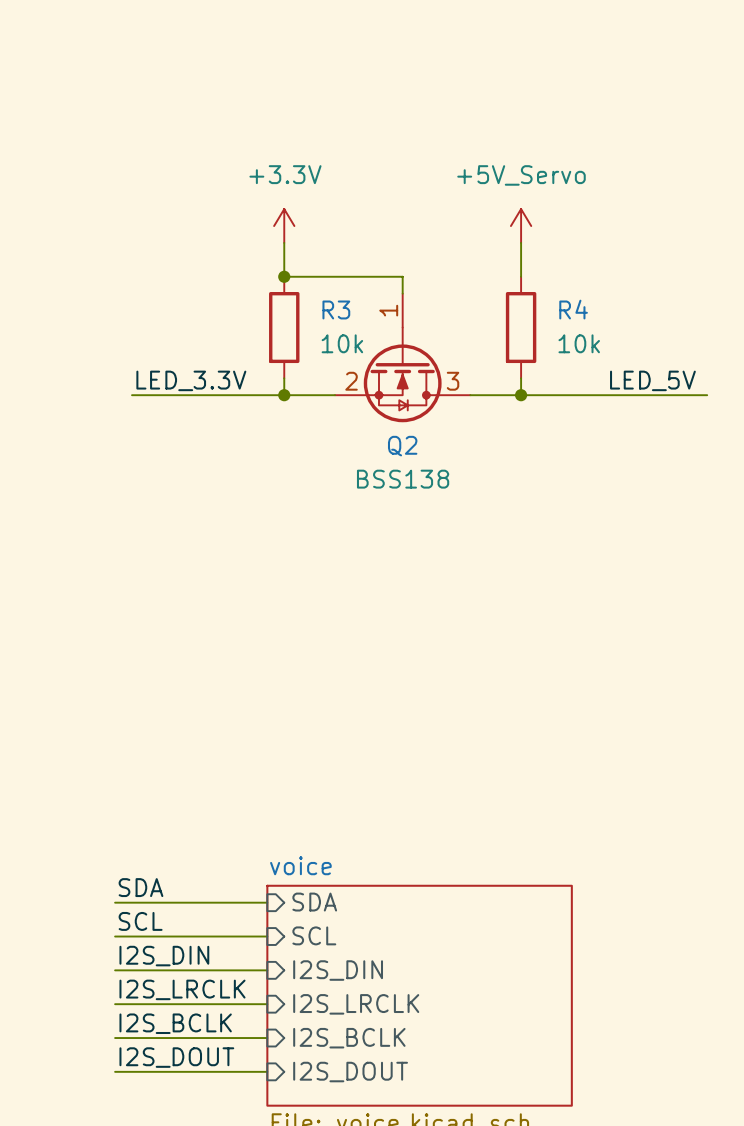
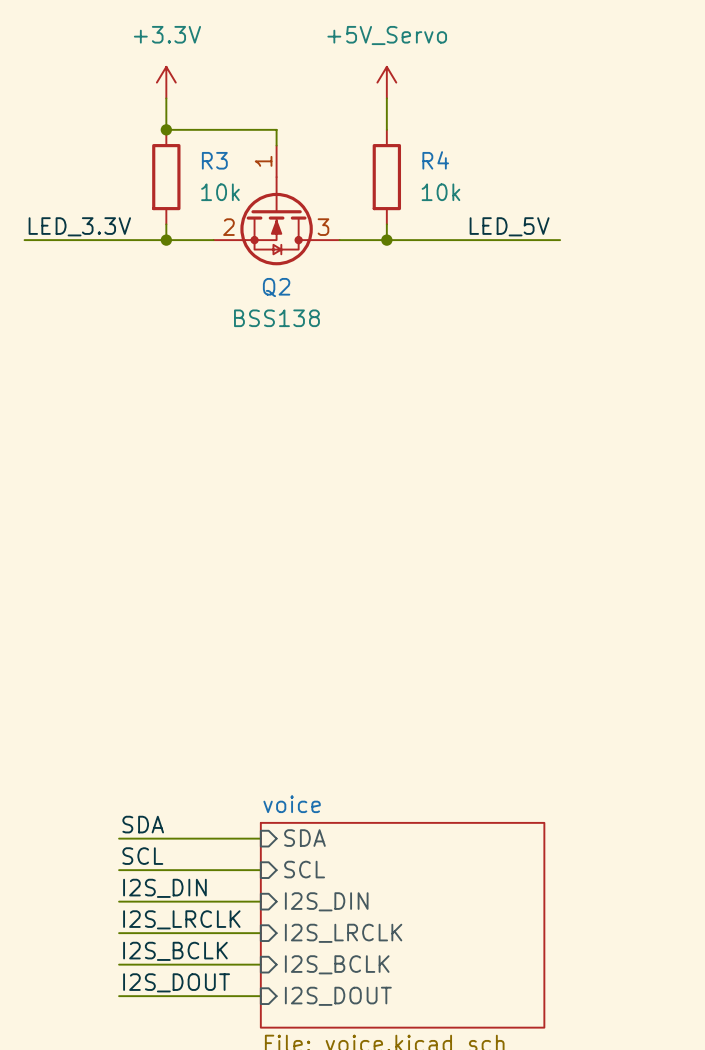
junction: none -> (166, 129)
power symbol position: +3.3V (284, 226) -> +3.3V (166, 82)
power symbol position: +5V_Servo (521, 226) -> +5V_Servo (386, 82)
wire: (284, 242) (284, 276) (402, 276) (402, 293) -> (166, 98) (166, 129) (276, 129) (276, 145)
wire: (521, 242) (521, 276) -> (386, 98) (386, 129)
junction: none -> (166, 240)
junction: none -> (386, 240)
junction: (284, 276) -> none
R3 position: (284, 327) -> (166, 177)
R4 position: (521, 327) -> (386, 177)
Q2 position: (402, 357) -> (276, 205)
wire: (284, 378) (284, 395) -> (166, 224) (166, 240)
wire: (521, 378) (521, 395) -> (386, 224) (386, 240)
label position: LED_3.3V (191, 380) -> LED_3.3V (79, 226)
label position: LED_5V (652, 380) -> LED_5V (509, 226)
wire: (132, 395) (335, 395) -> (24, 240) (213, 240)
junction: (284, 395) -> none
wire: (470, 395) (707, 395) -> (339, 240) (560, 240)
junction: (521, 395) -> none

